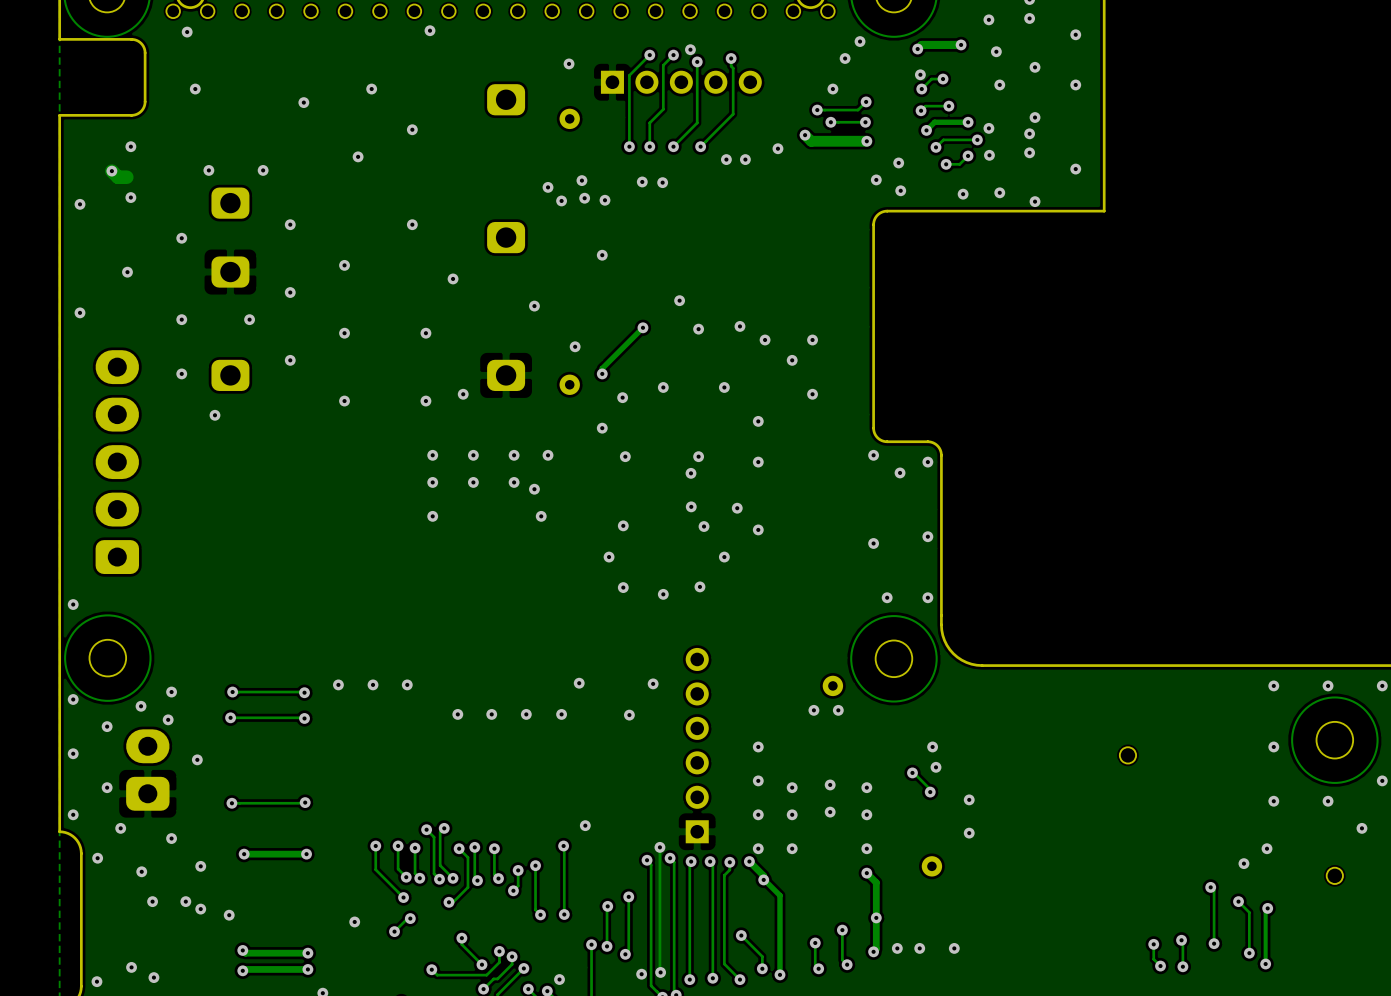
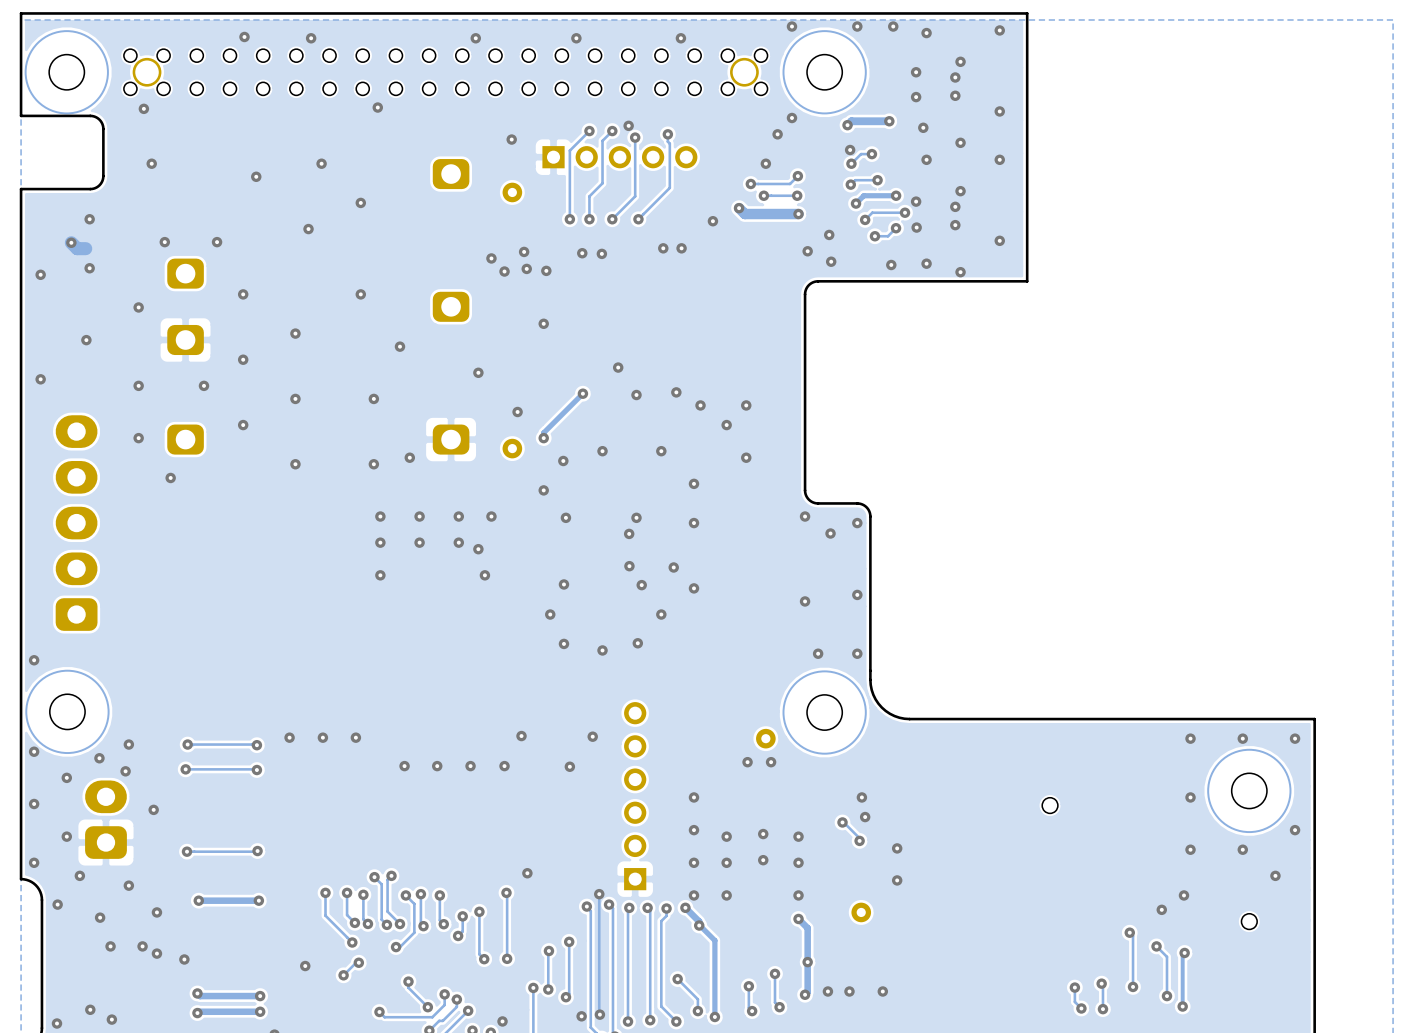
via: (726, 159) -> none
via: (745, 159) -> none
via: none -> (663, 248)
via: none -> (681, 248)

